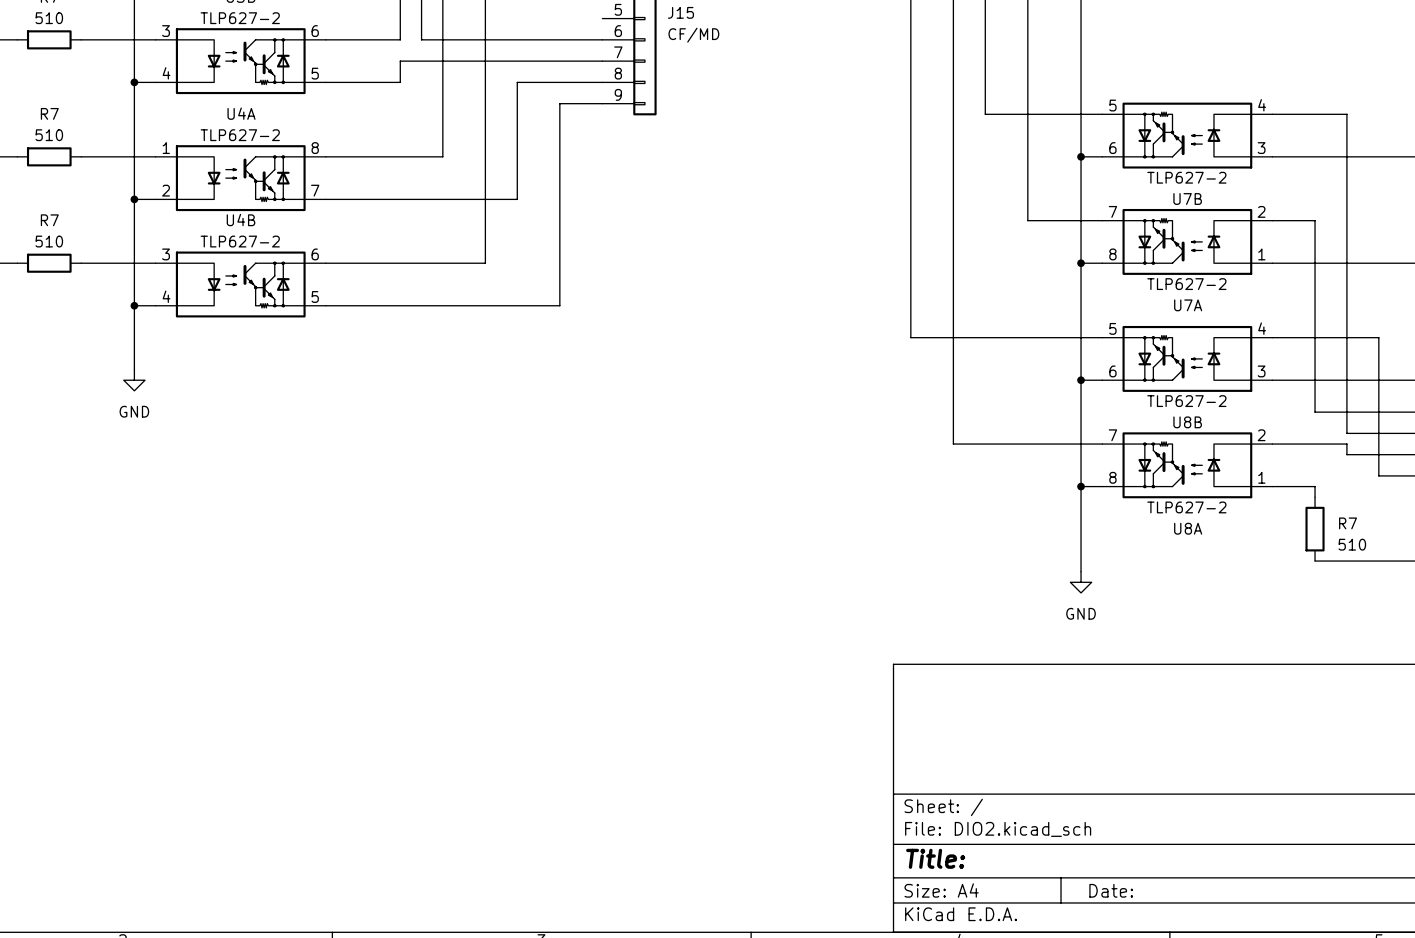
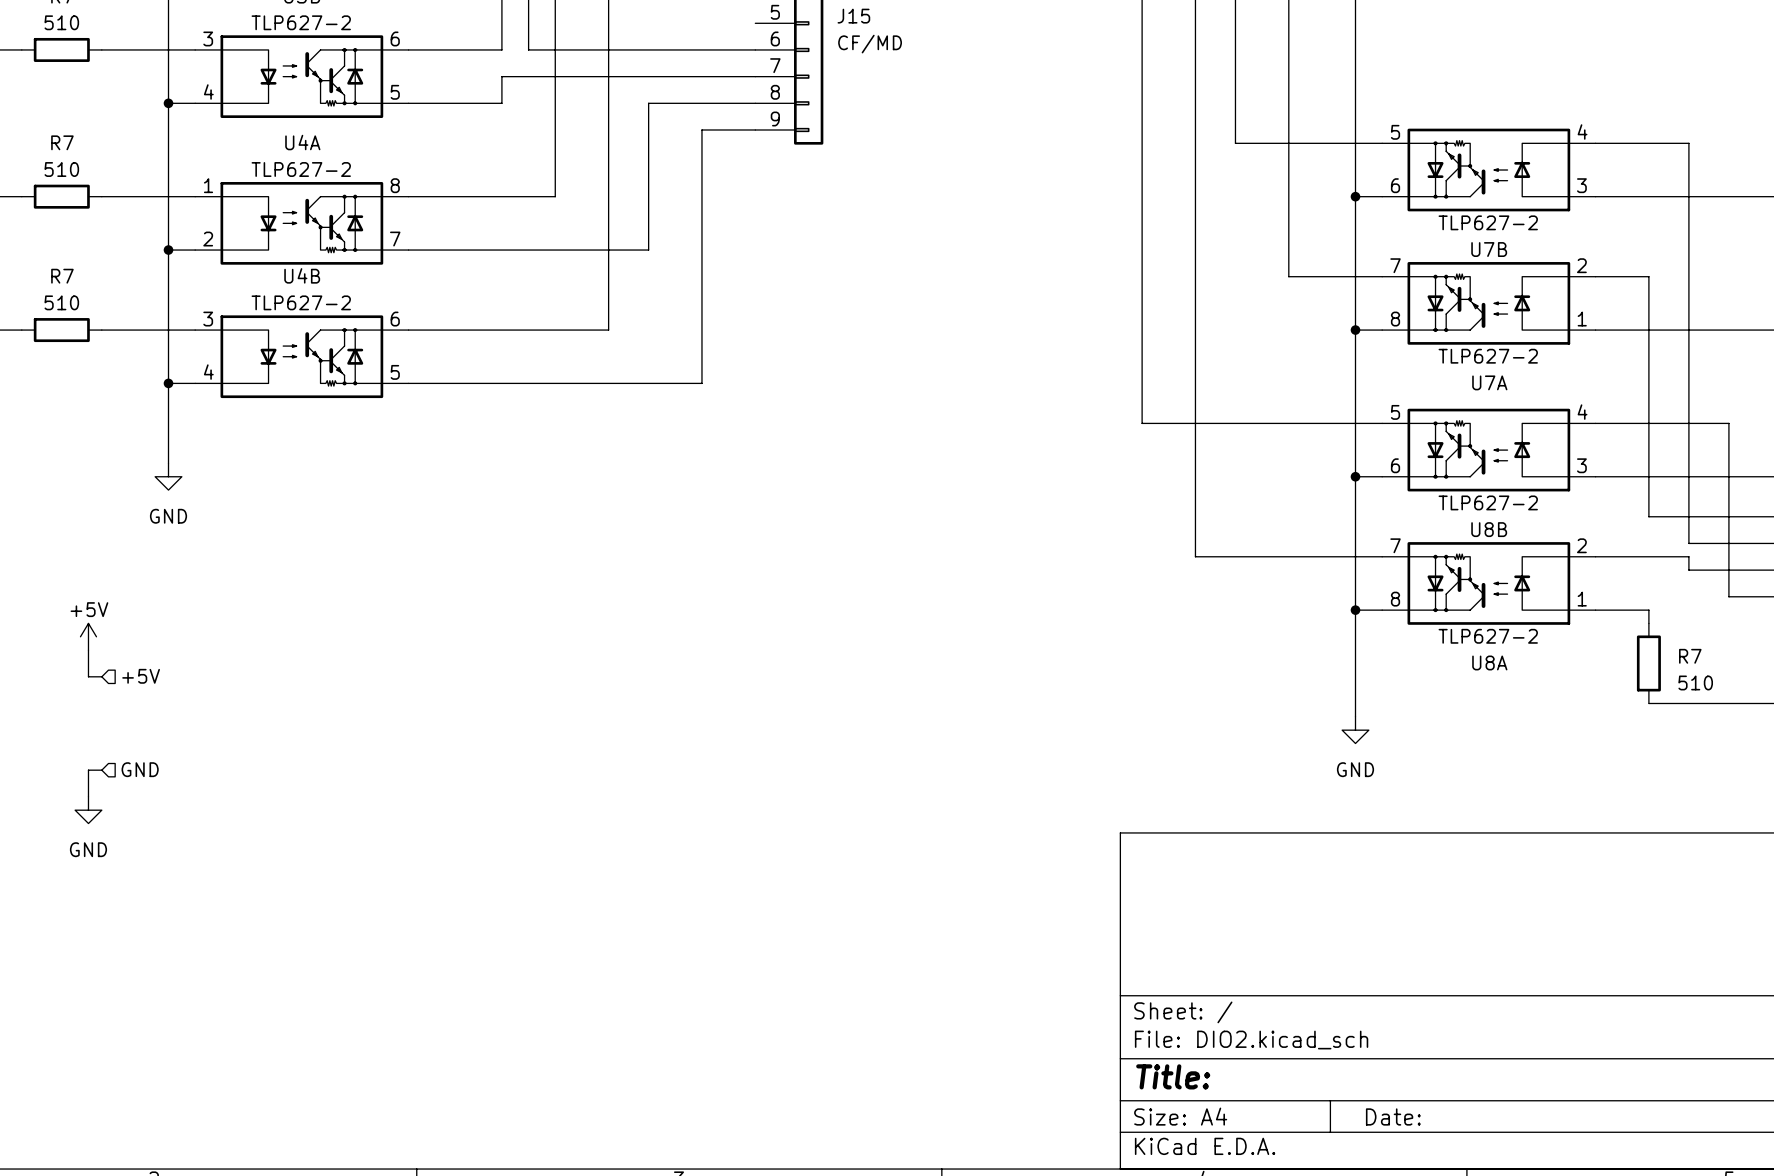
power symbol: none -> +5V (88, 636)
wire: none -> (88, 650) (88, 676) (101, 676)
hierarchical label: none -> +5V (141, 676)
hierarchical label: none -> GND (140, 769)
wire: none -> (101, 770) (88, 770) (88, 796)
power symbol: none -> GND (88, 810)

